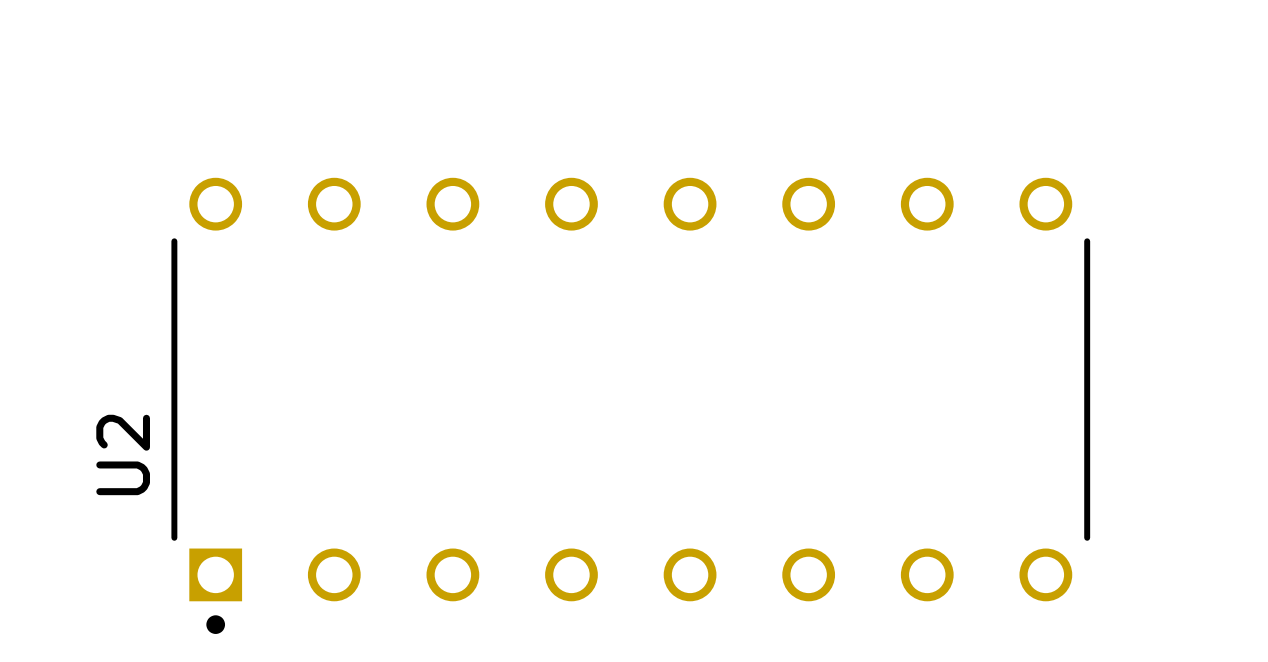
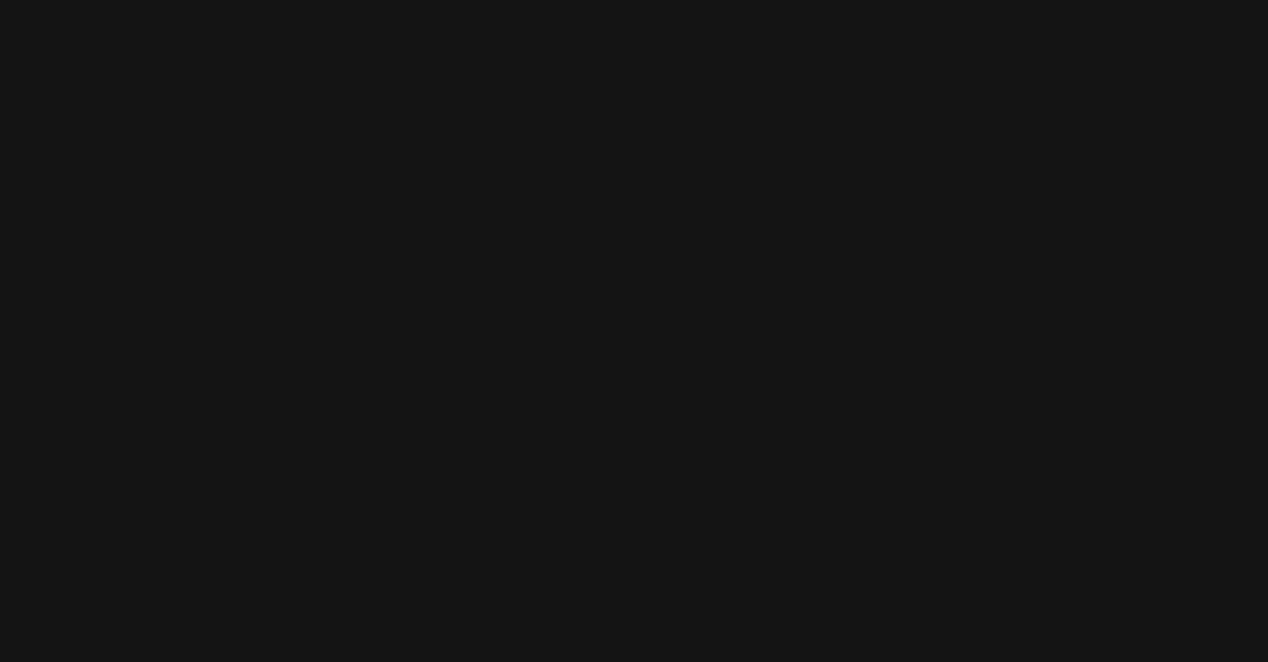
U2: (630, 405) -> none

